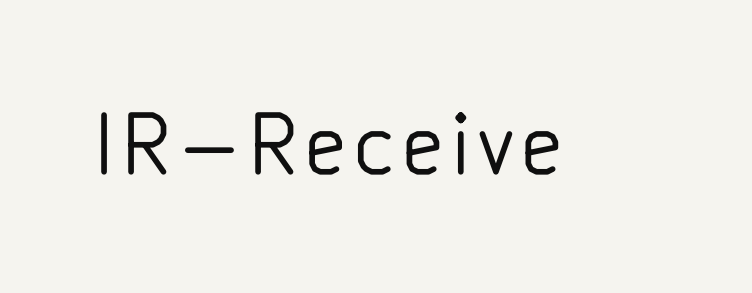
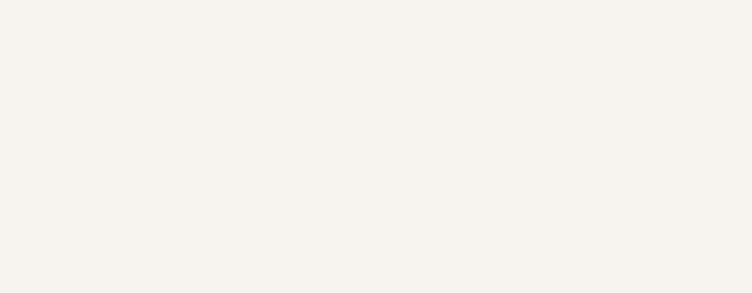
label: IR-Receive (329, 143) -> none

